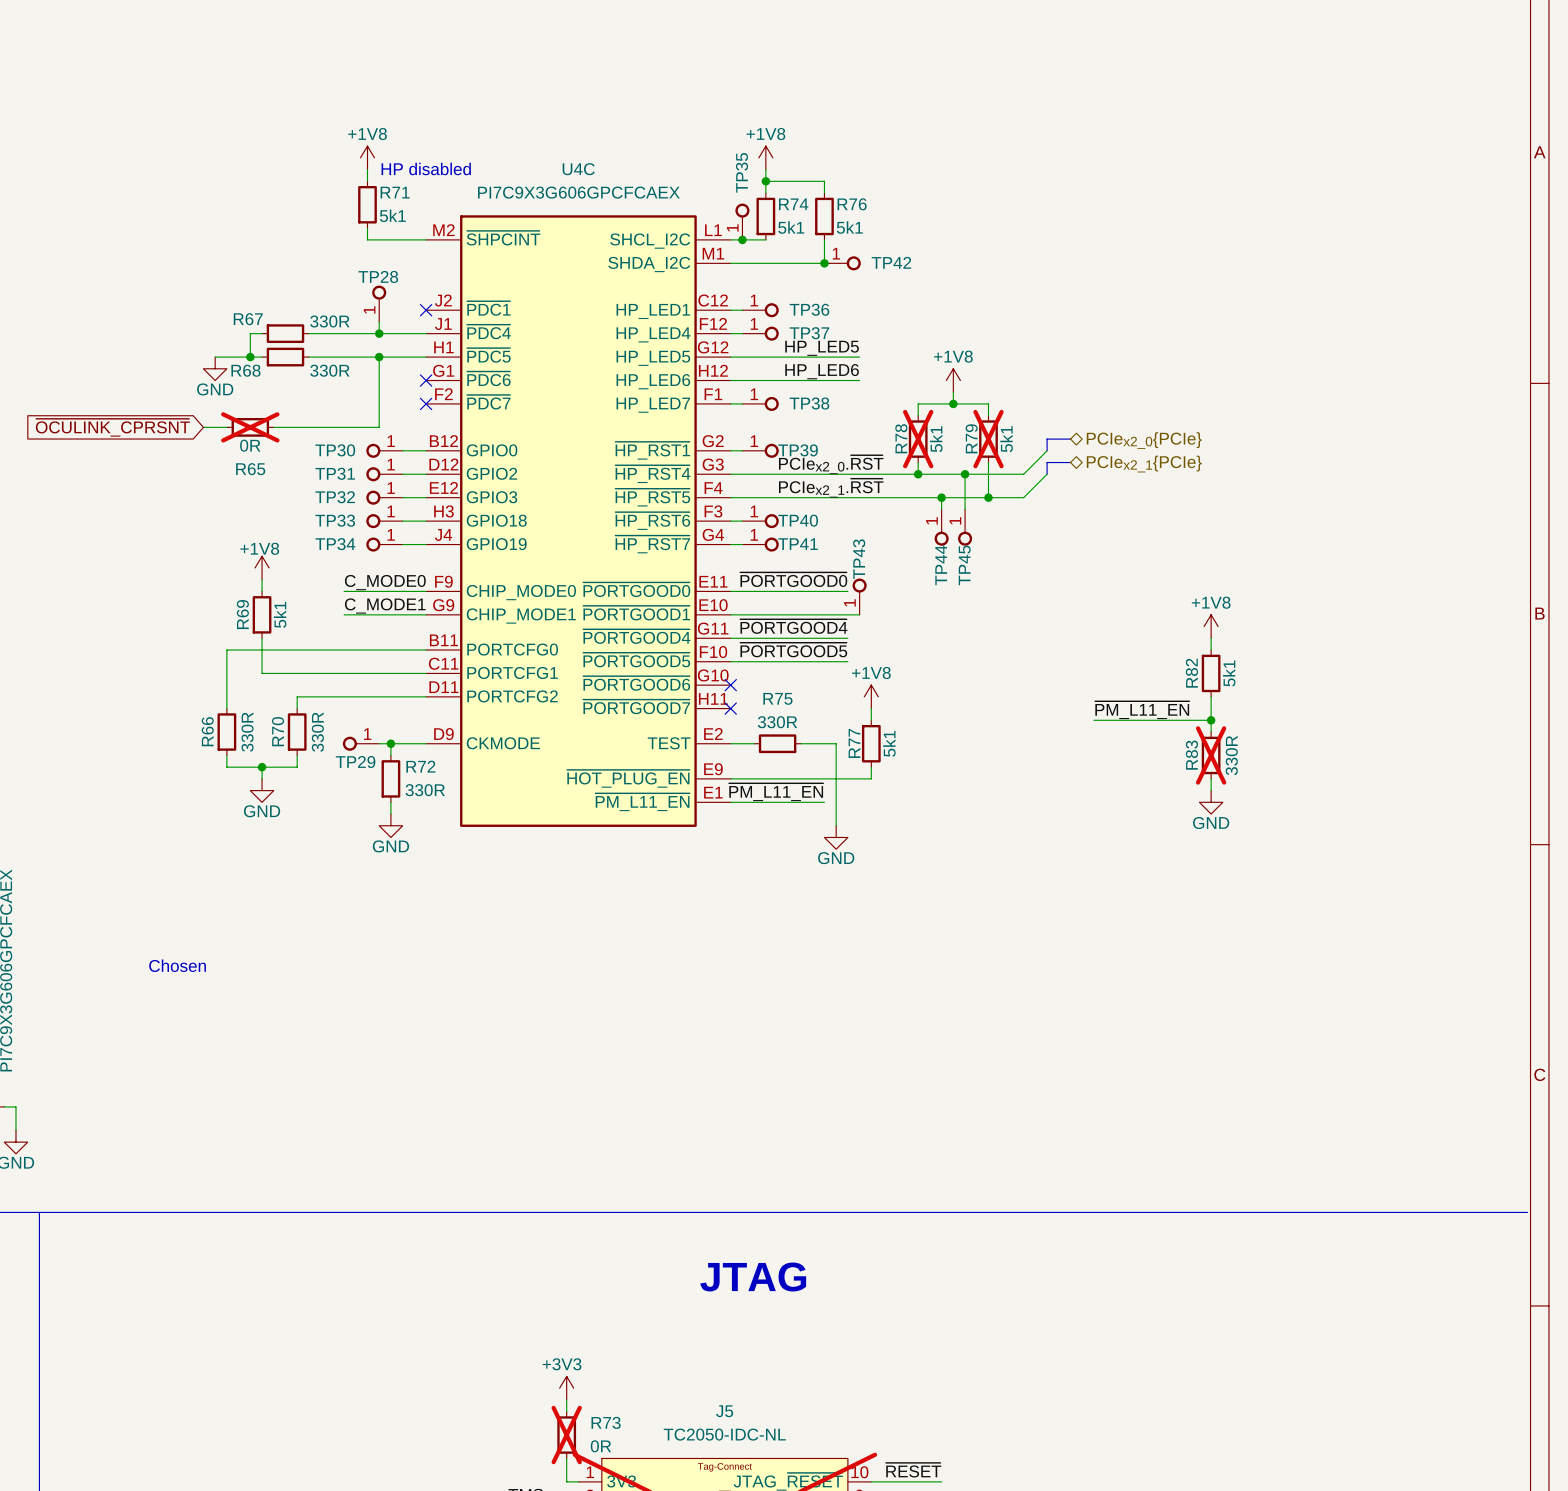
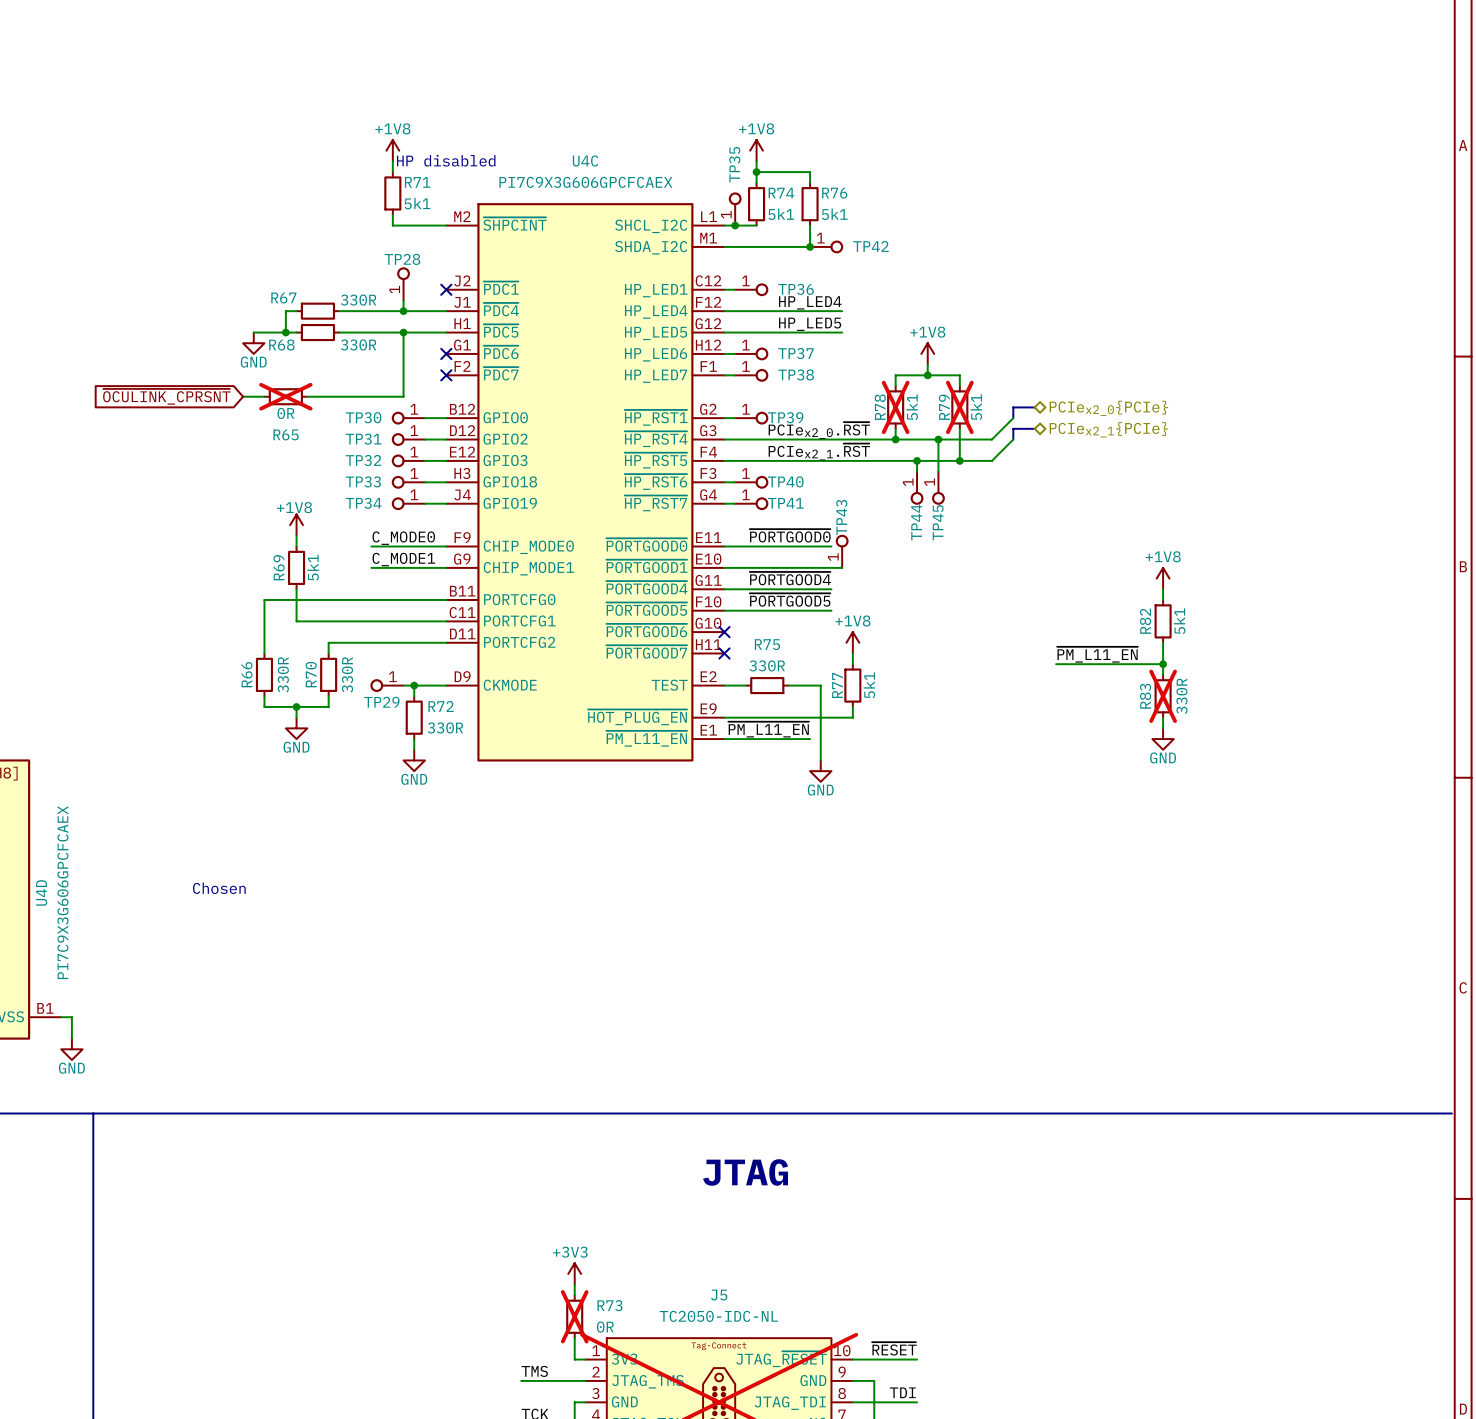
label: none -> HP_LED4 (810, 302)
TP37 position: (760, 333) -> (751, 353)
label: HP_LED6 (822, 371) -> none
wire: (742, 380) (859, 380) -> (735, 311) (842, 311)

